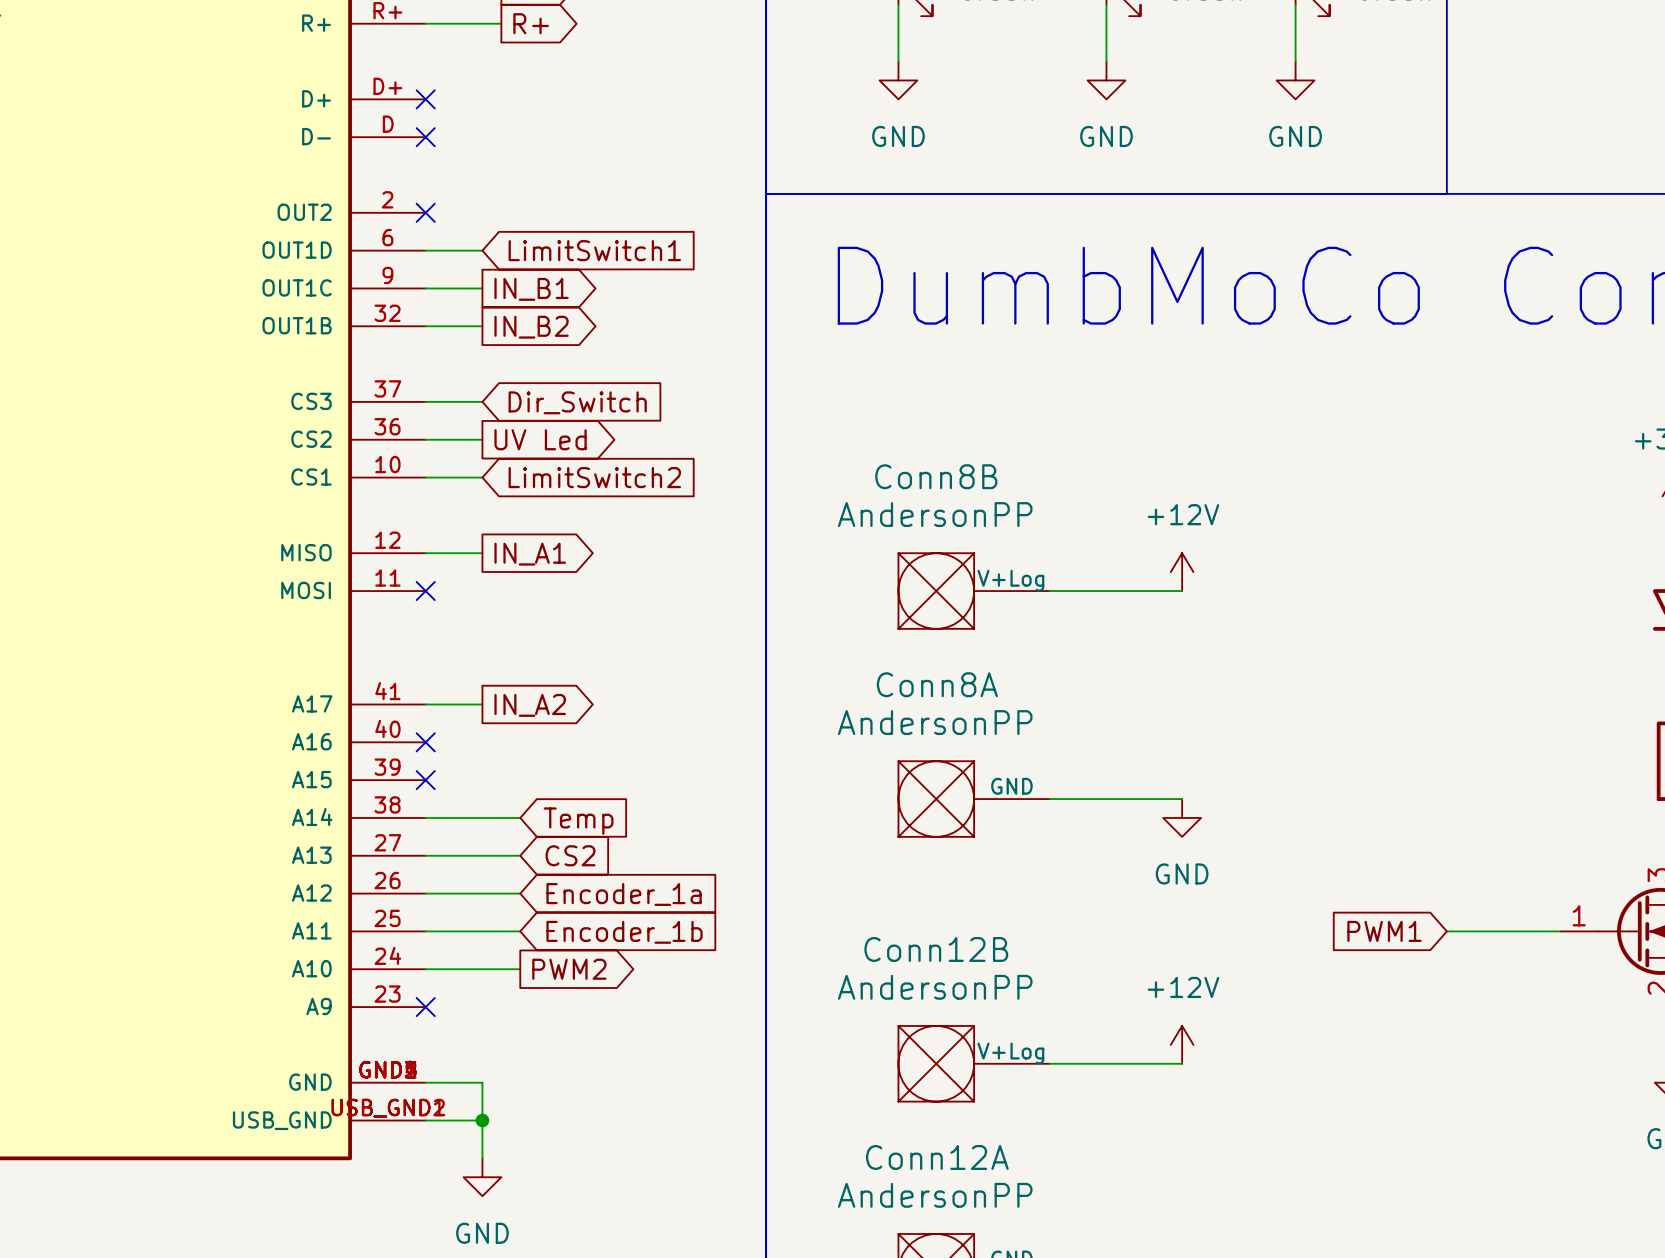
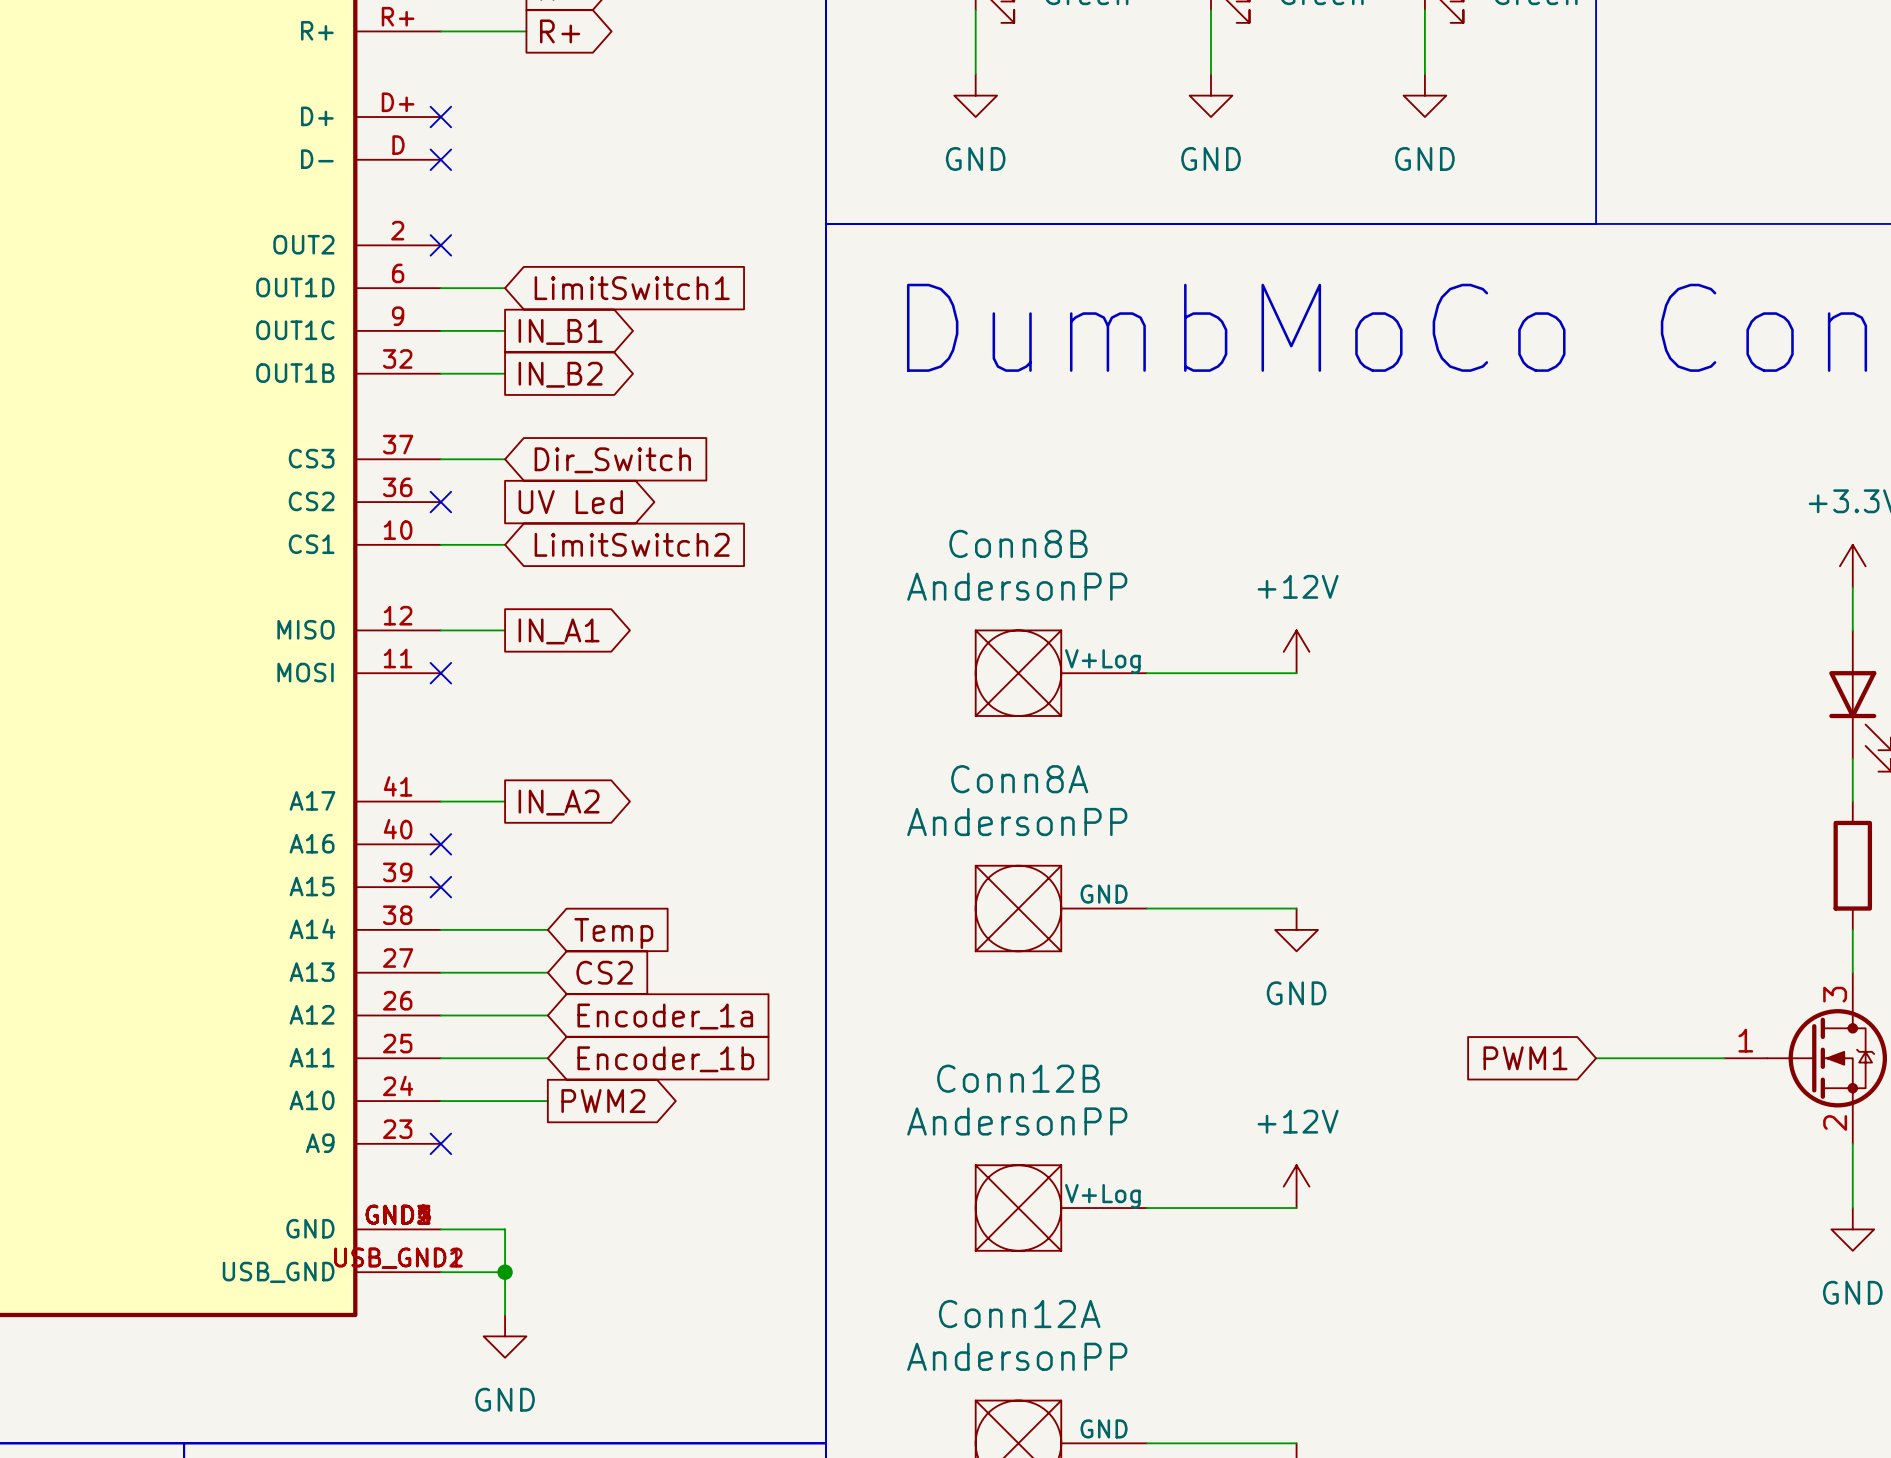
wire: (425, 439) (482, 439) -> none
no-connect mark: none -> (440, 502)

